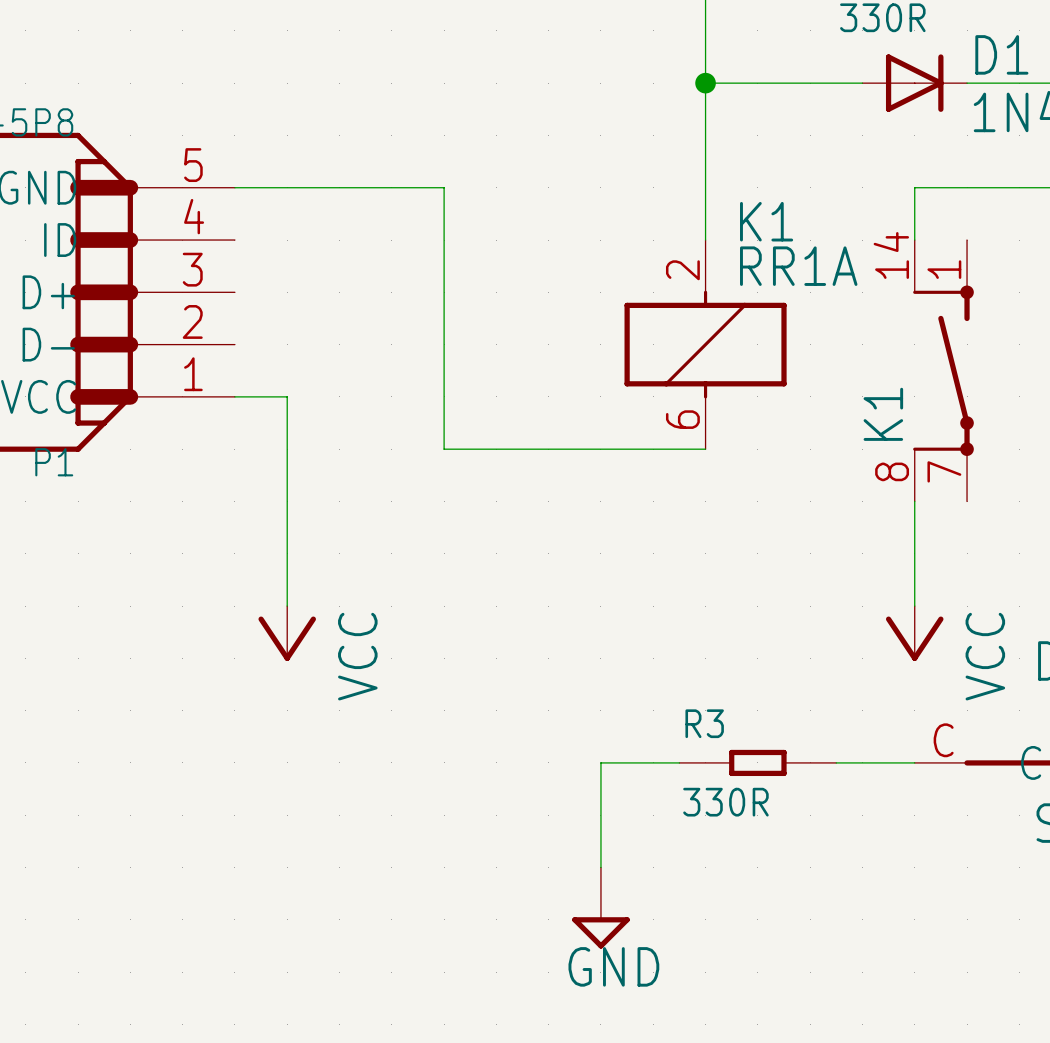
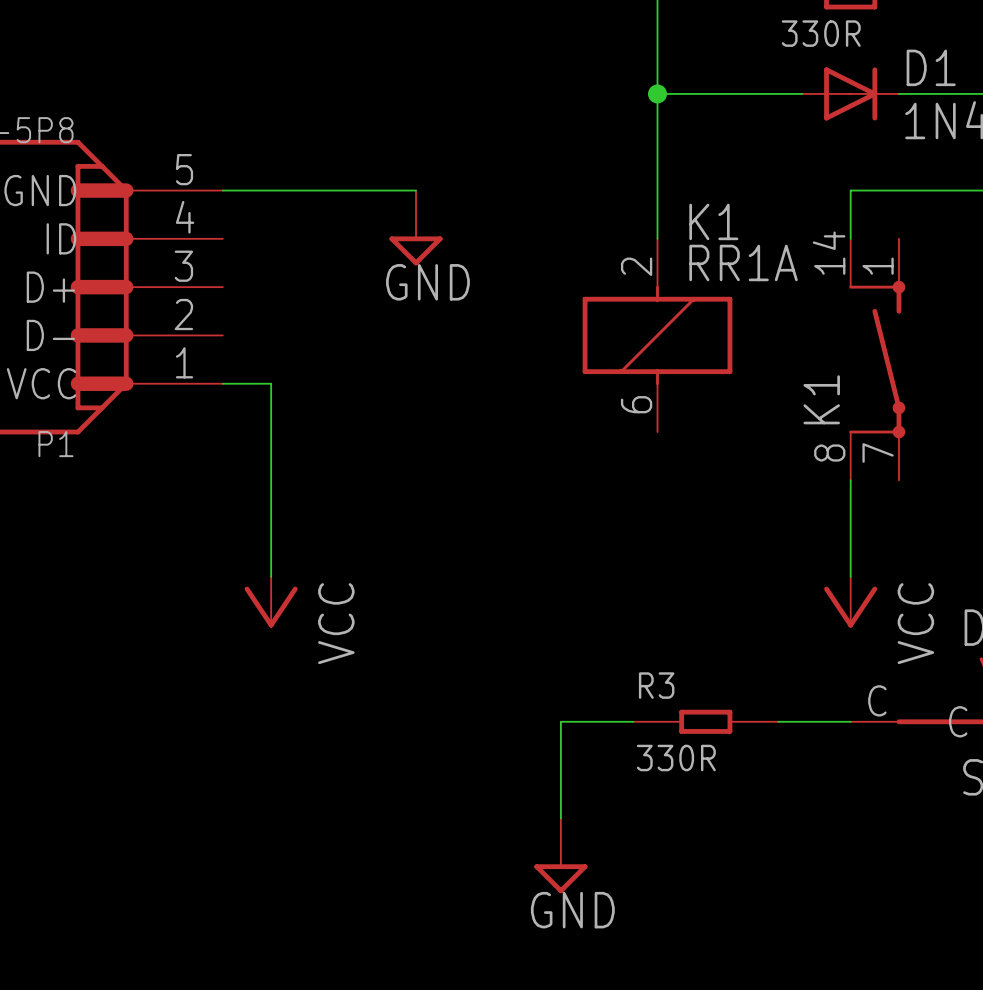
wire: (444, 187) (444, 449) (705, 449) -> none
power symbol: none -> GND (416, 227)

